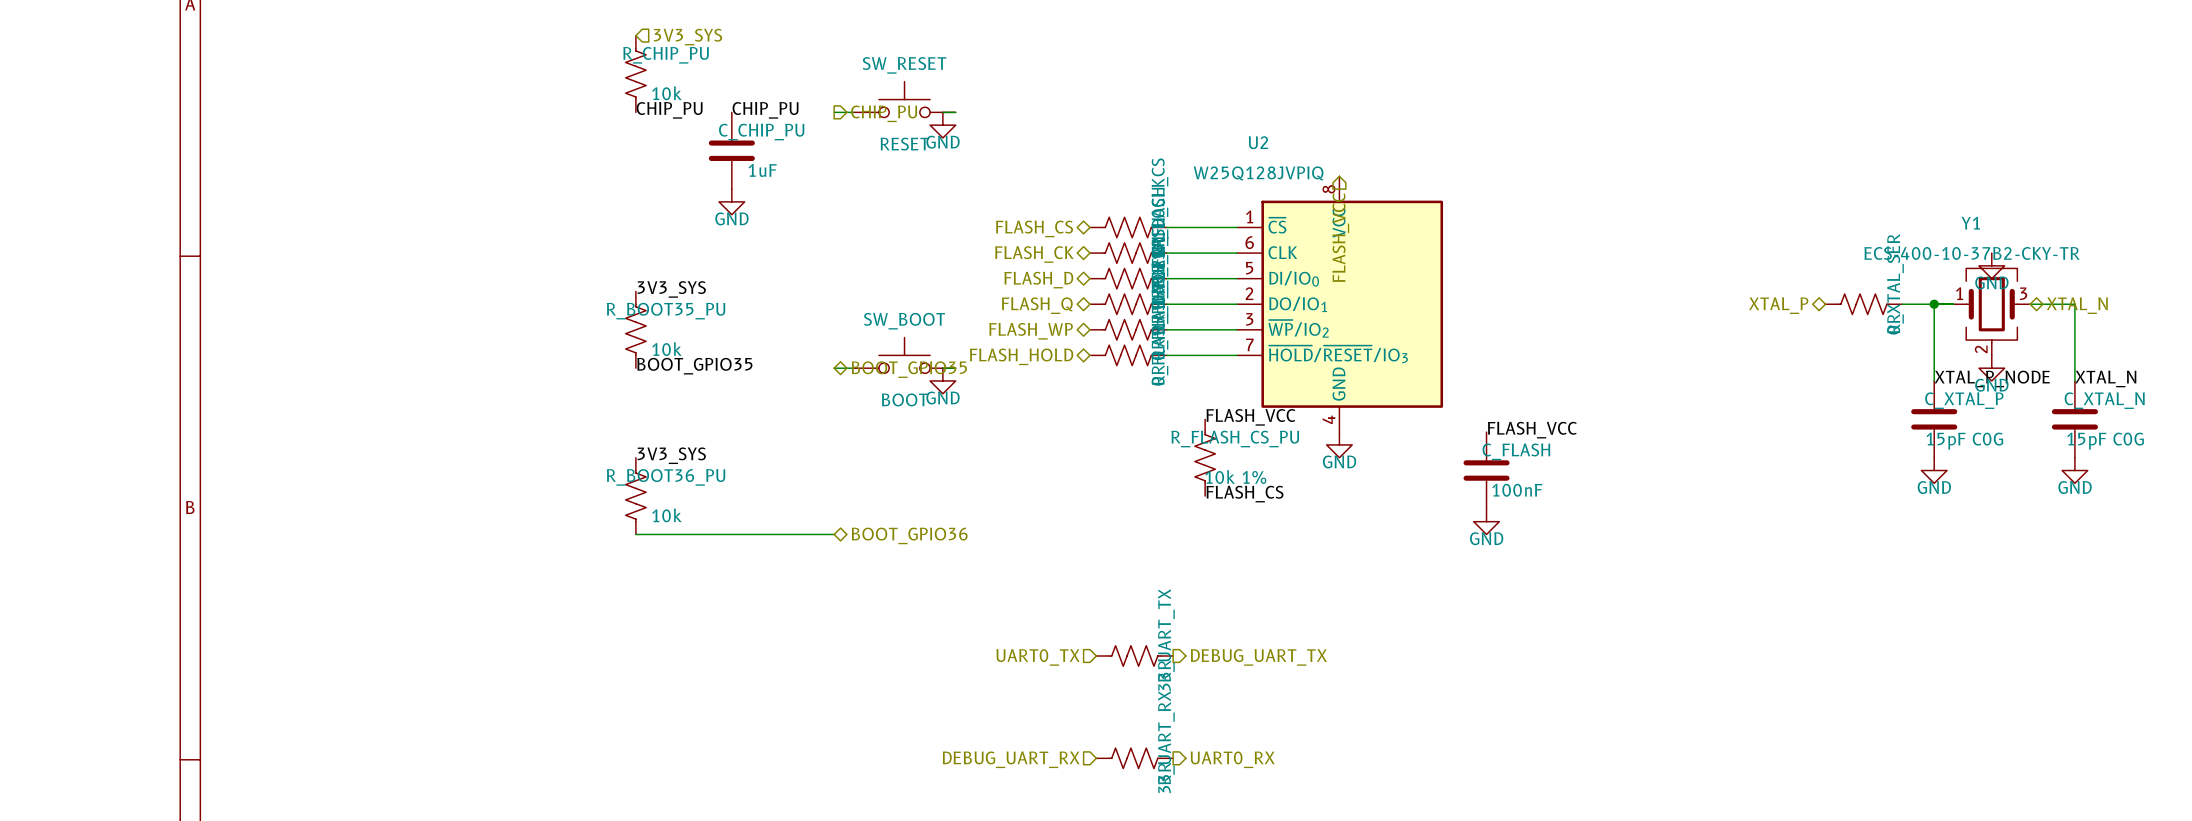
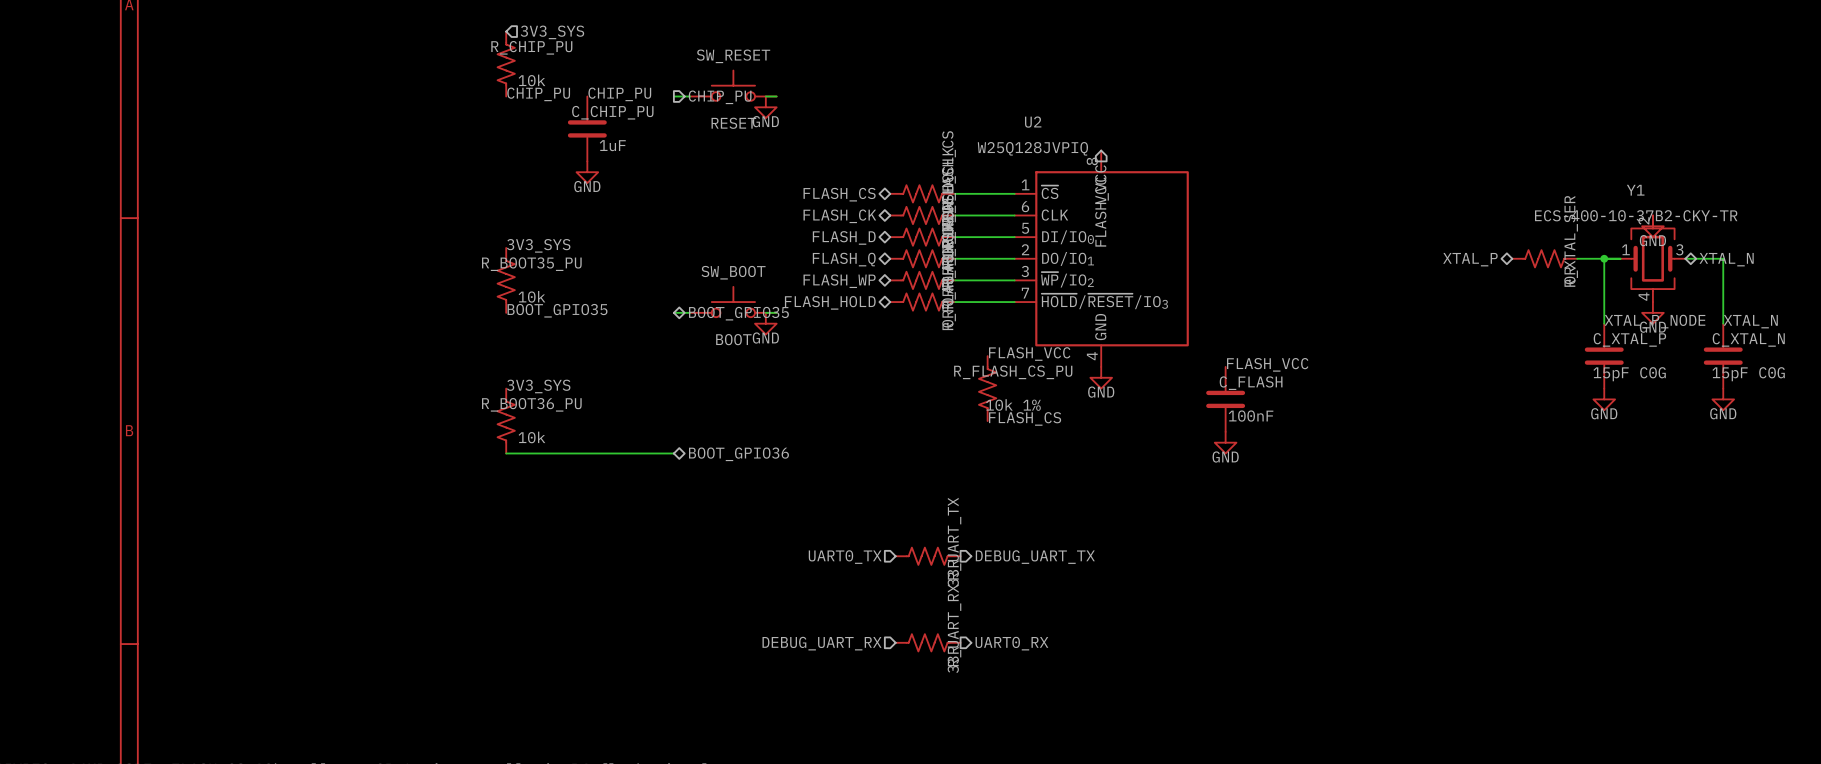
Y1 symbol: [1953, 268, 2031, 356] -> [1620, 215, 1686, 303]

